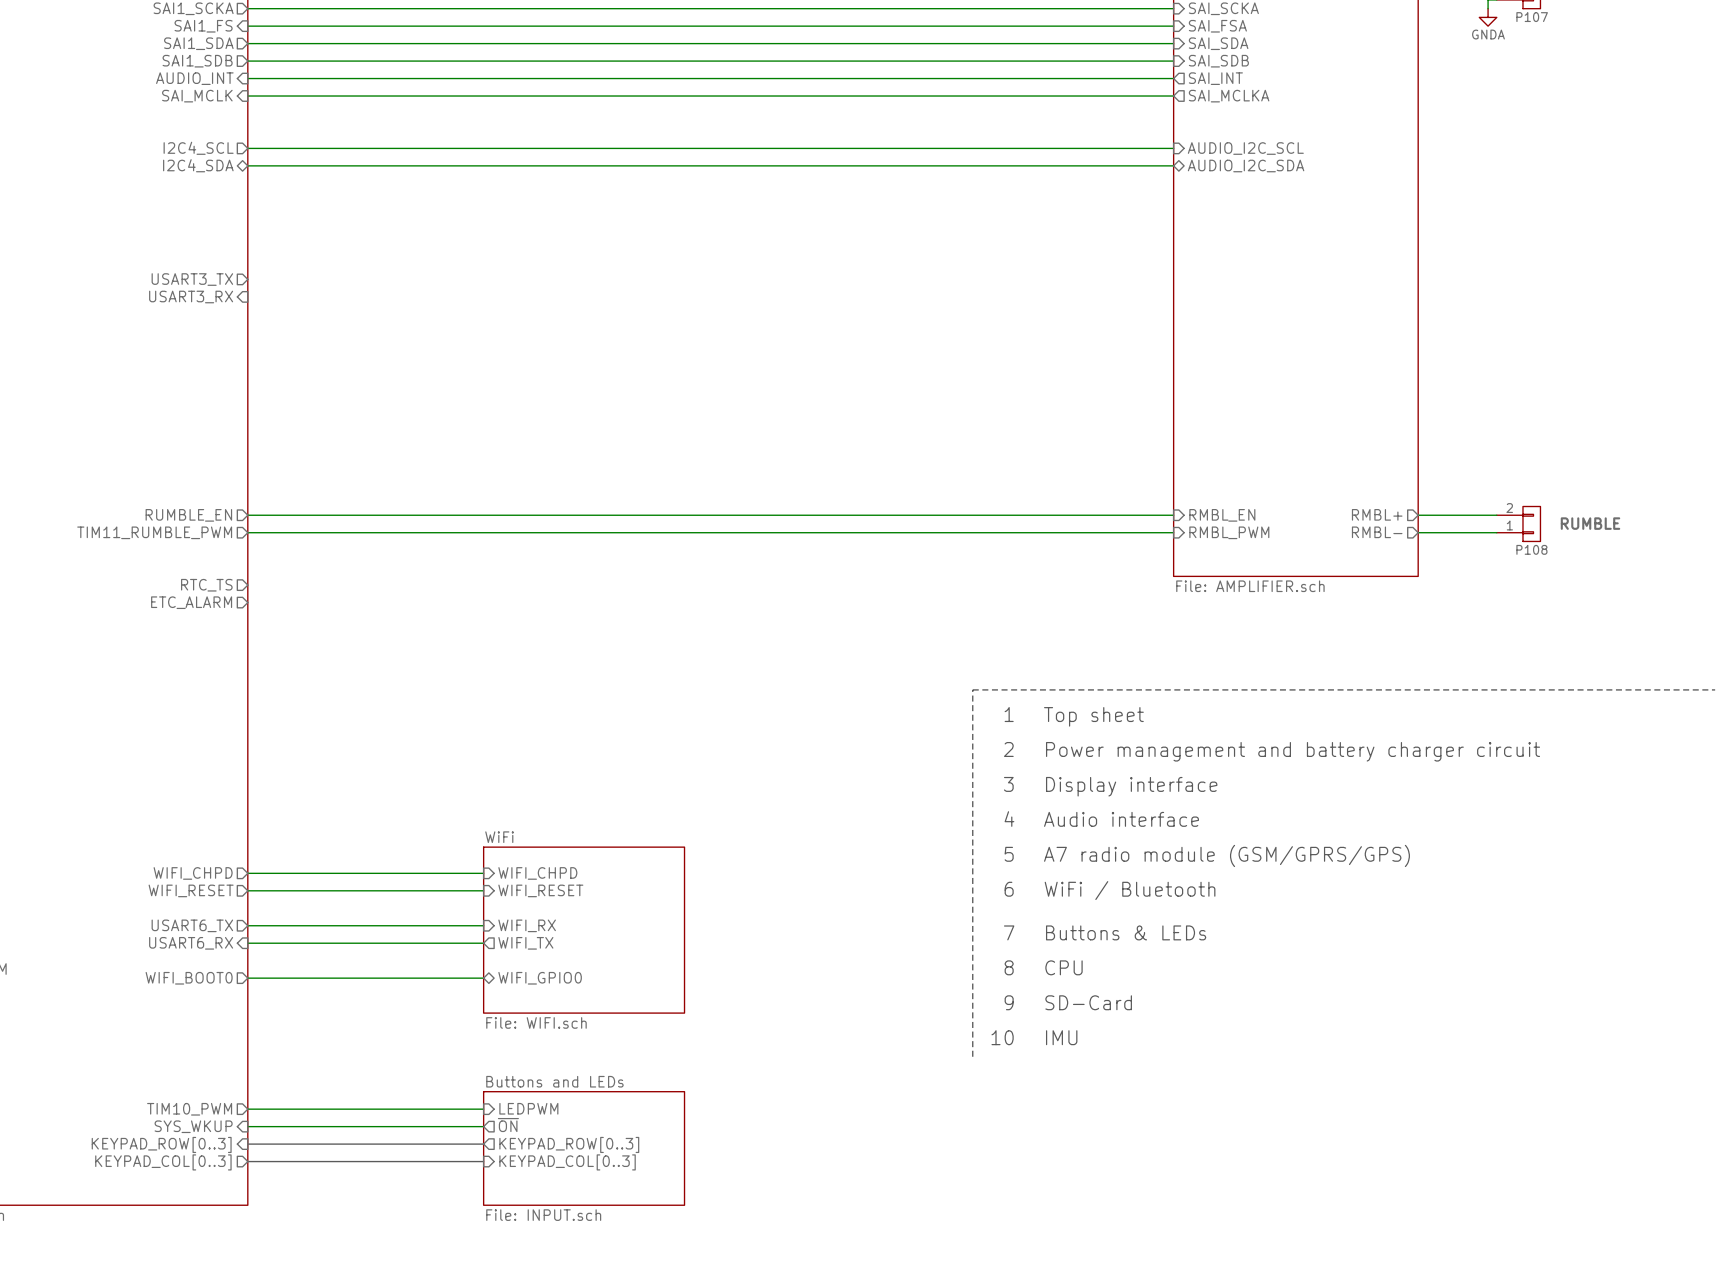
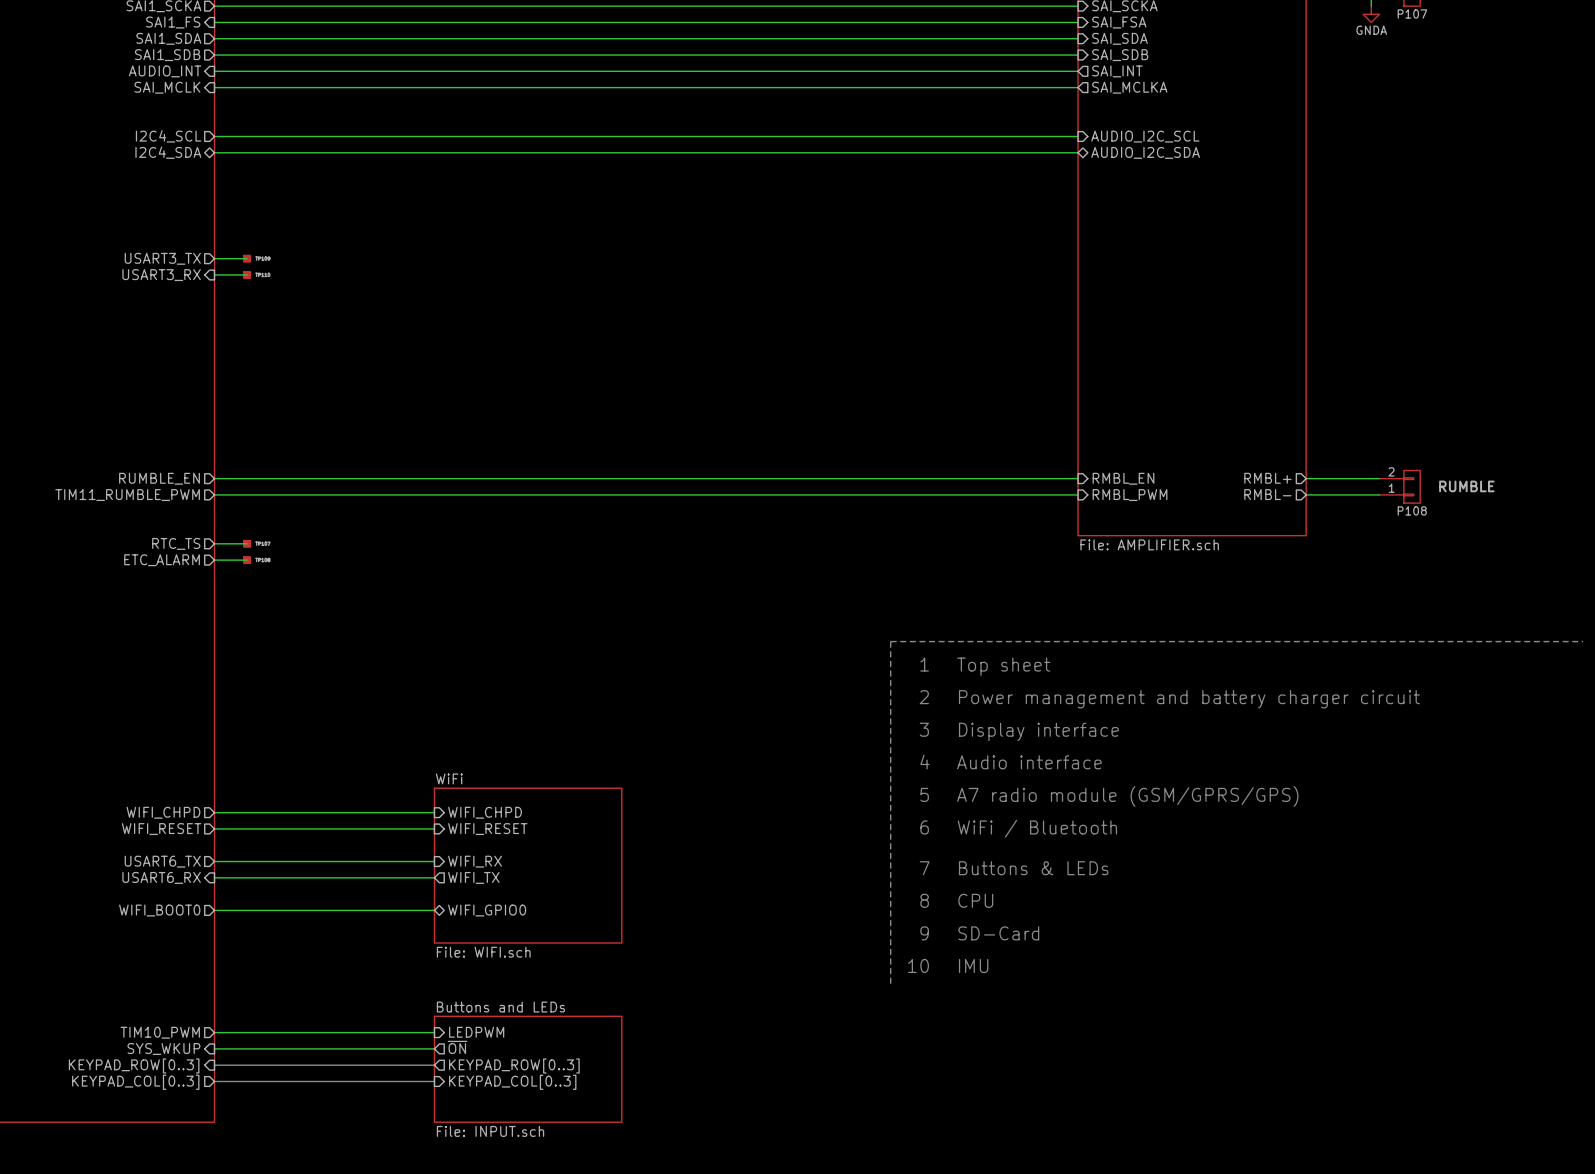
wire: none -> (214, 258) (247, 258)
part: none -> (247, 258)
wire: none -> (214, 274) (247, 274)
part: none -> (247, 274)
wire: none -> (214, 543) (247, 543)
part: none -> (247, 543)
wire: none -> (214, 560) (247, 560)
part: none -> (247, 560)

